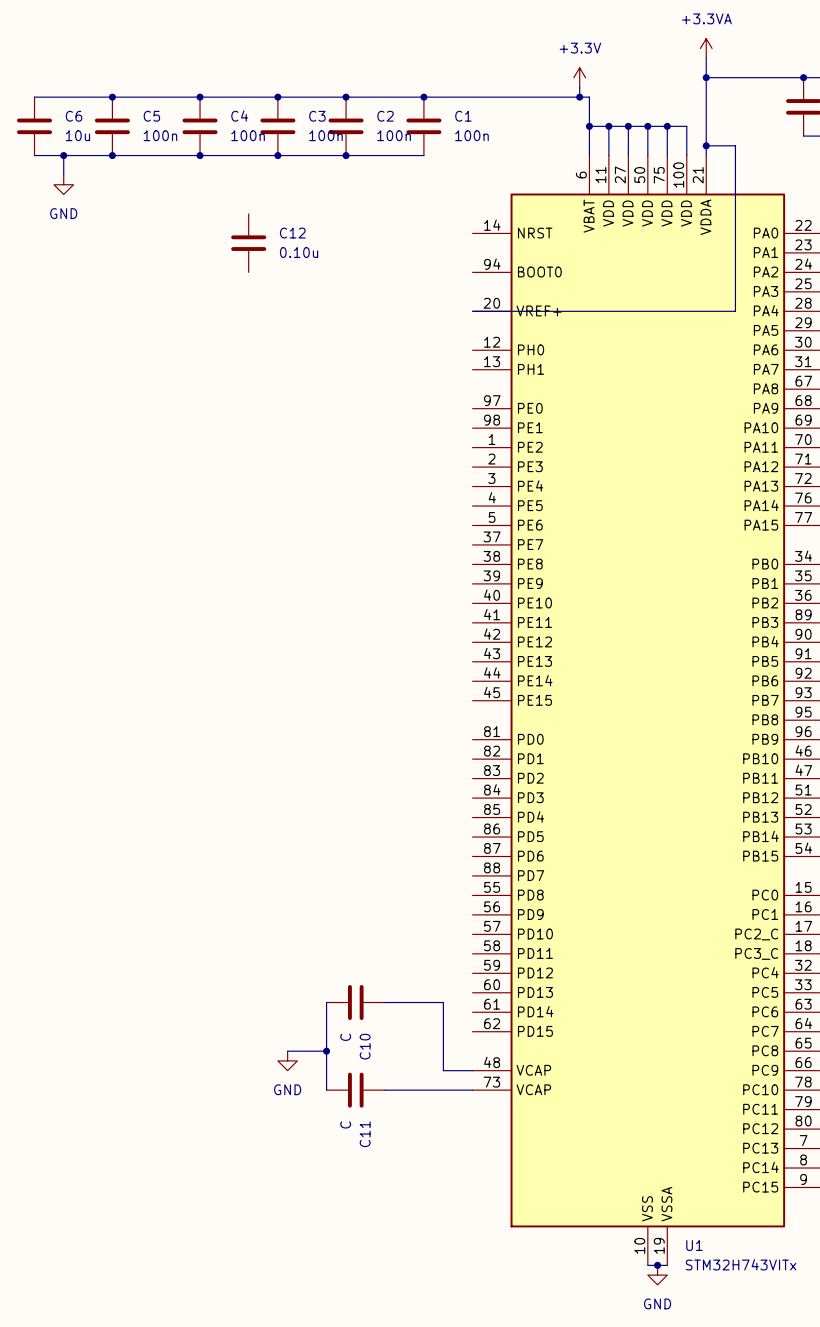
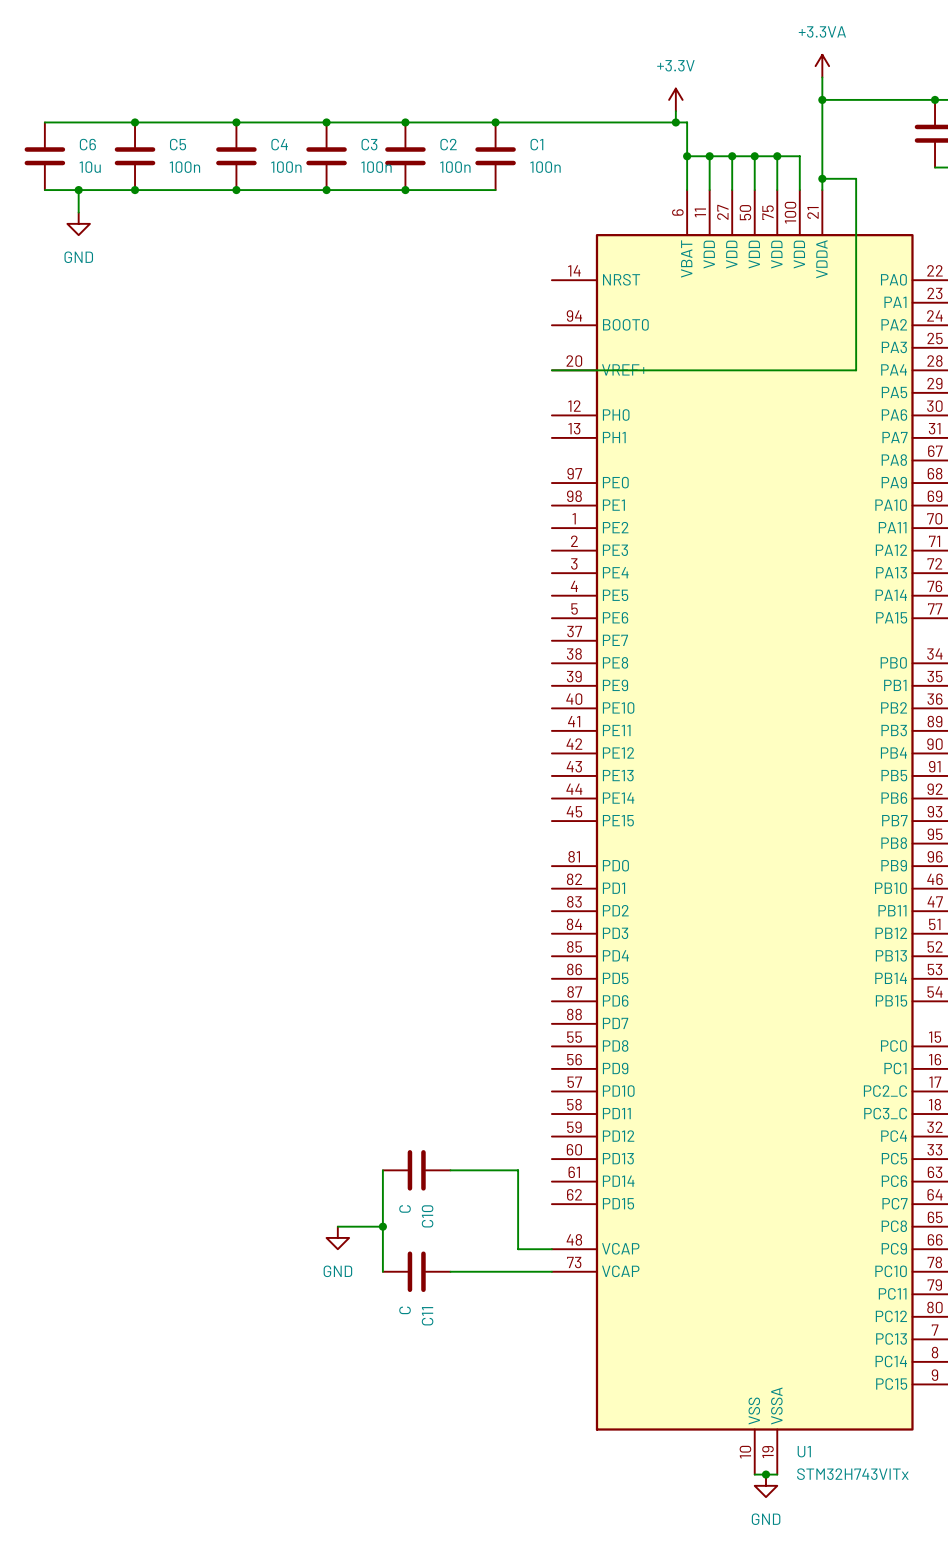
C12: 0.10u (248, 243) -> none

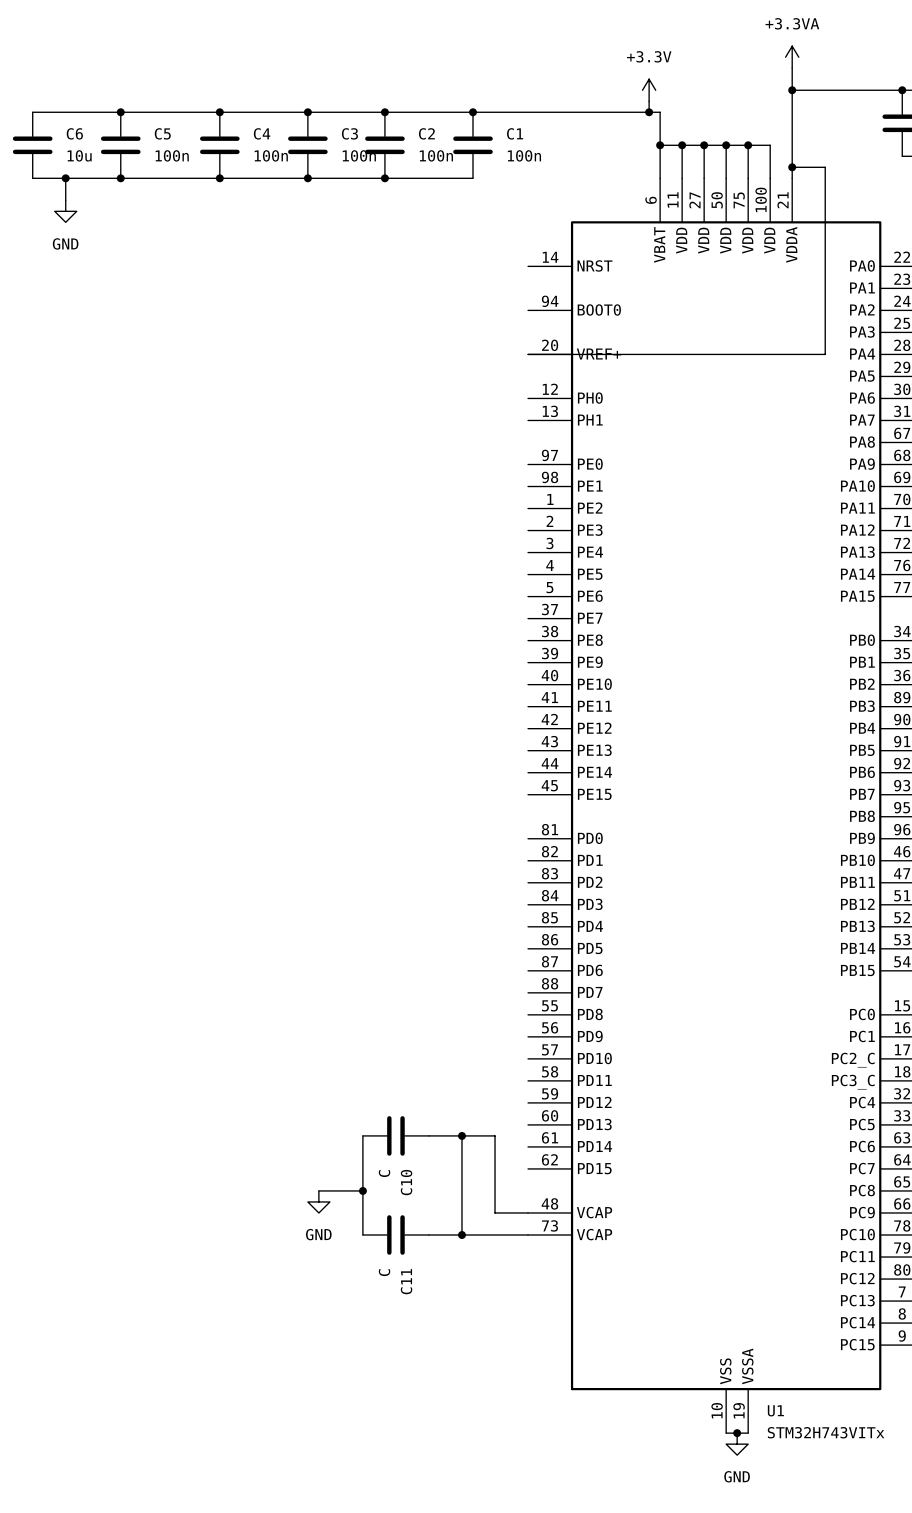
wire: none -> (461, 1135) (461, 1235)
junction: none -> (461, 1135)
junction: none -> (461, 1235)

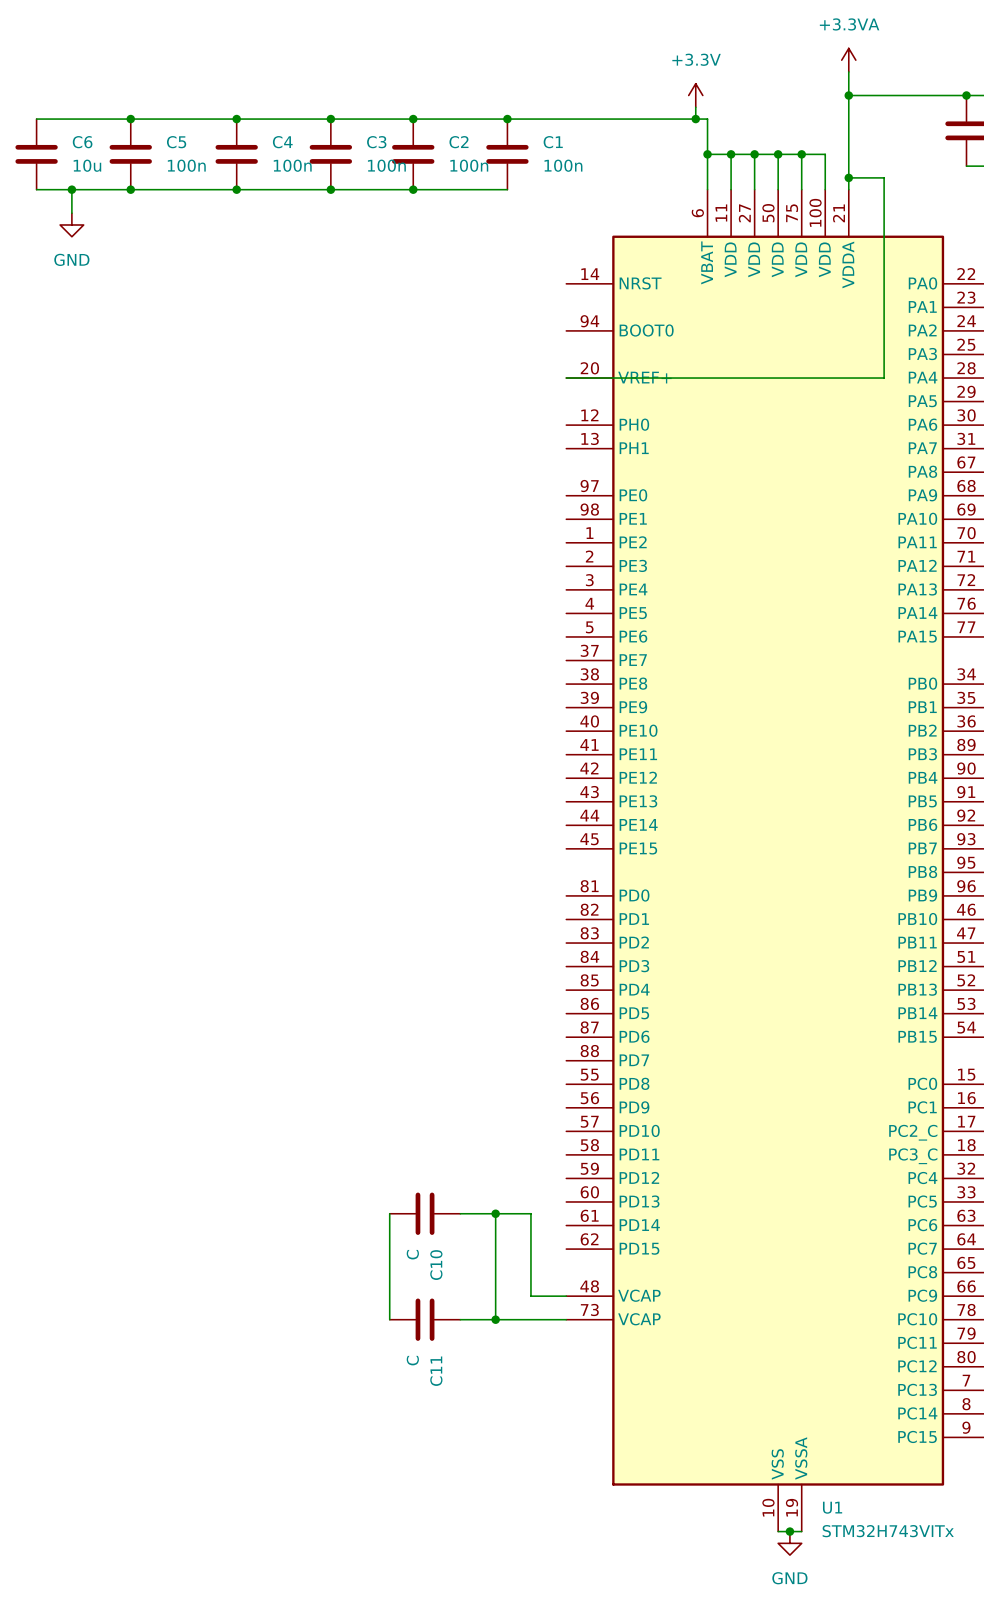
wire: (318, 1190) (362, 1190) -> none
junction: (362, 1190) -> none
power symbol: GND (318, 1201) -> none

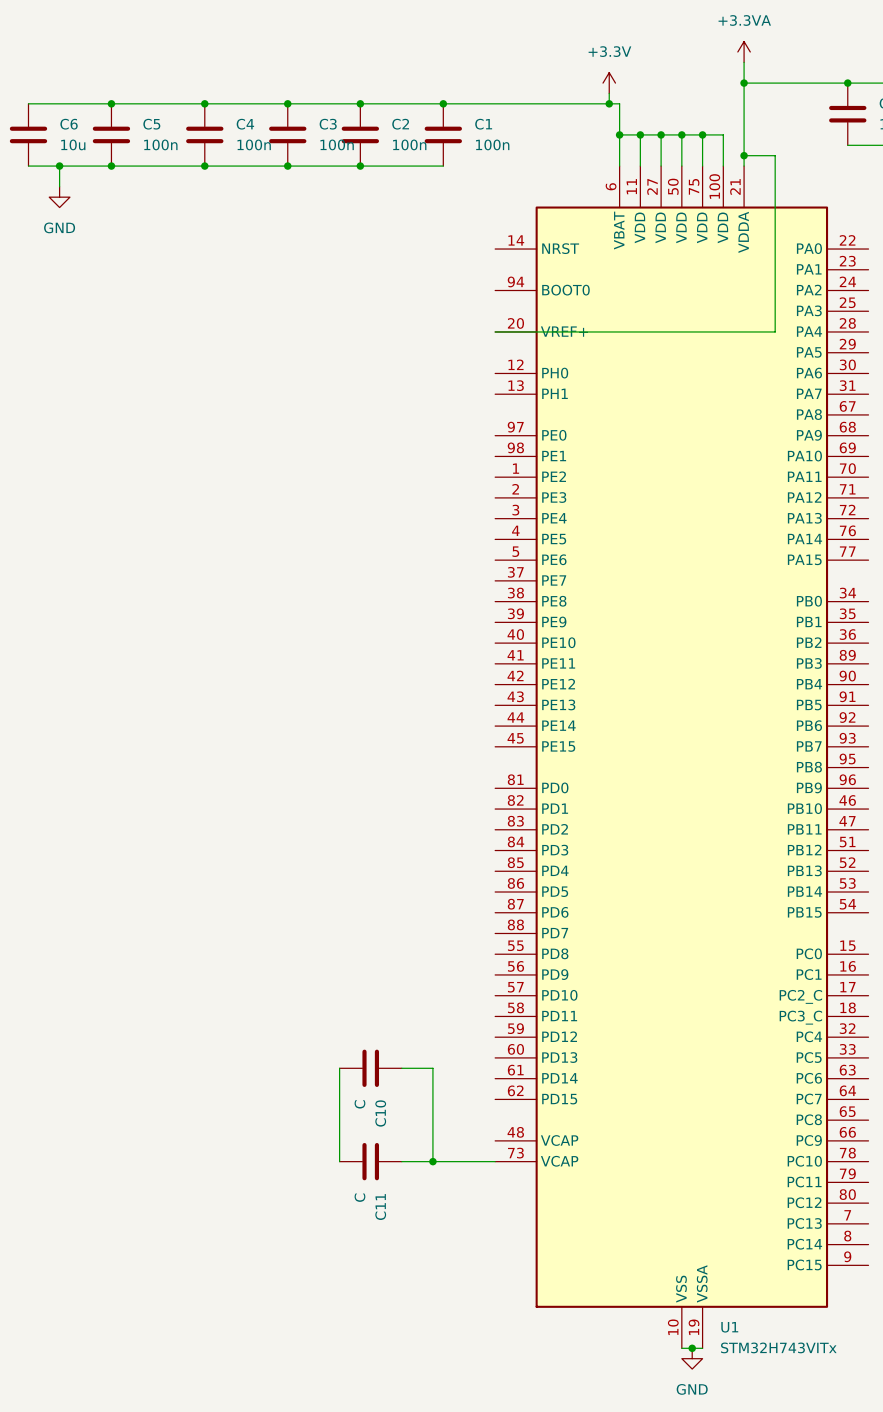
wire: (495, 1213) (530, 1213) (530, 1296) (566, 1296) -> none
junction: (495, 1213) -> none

